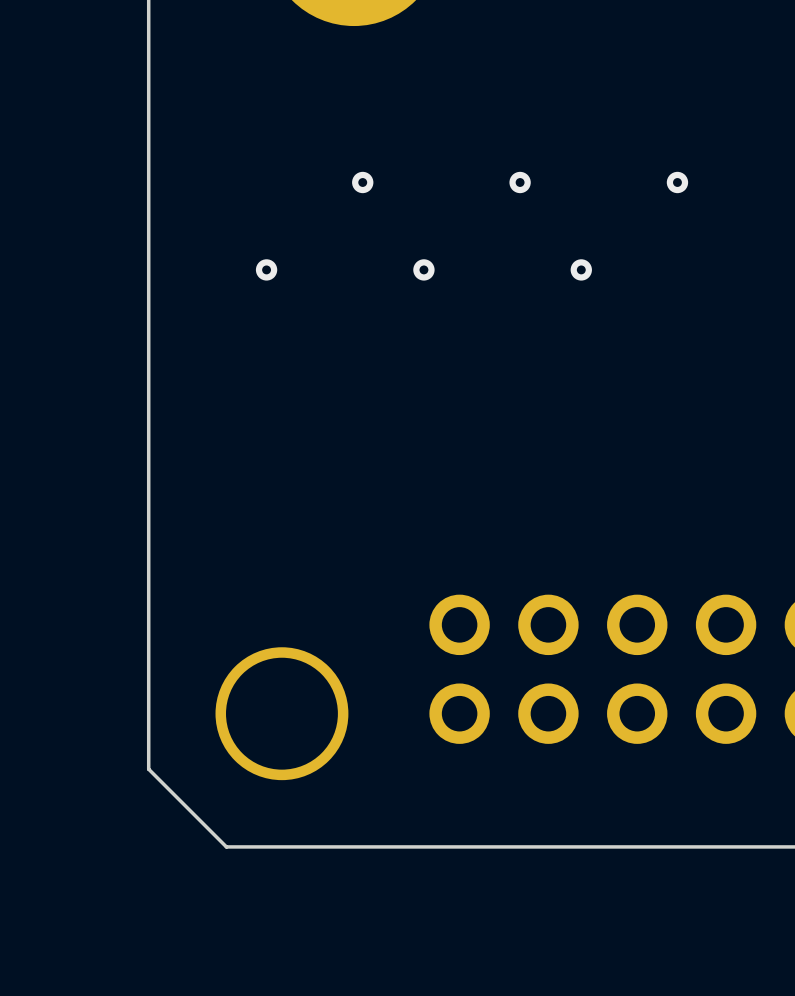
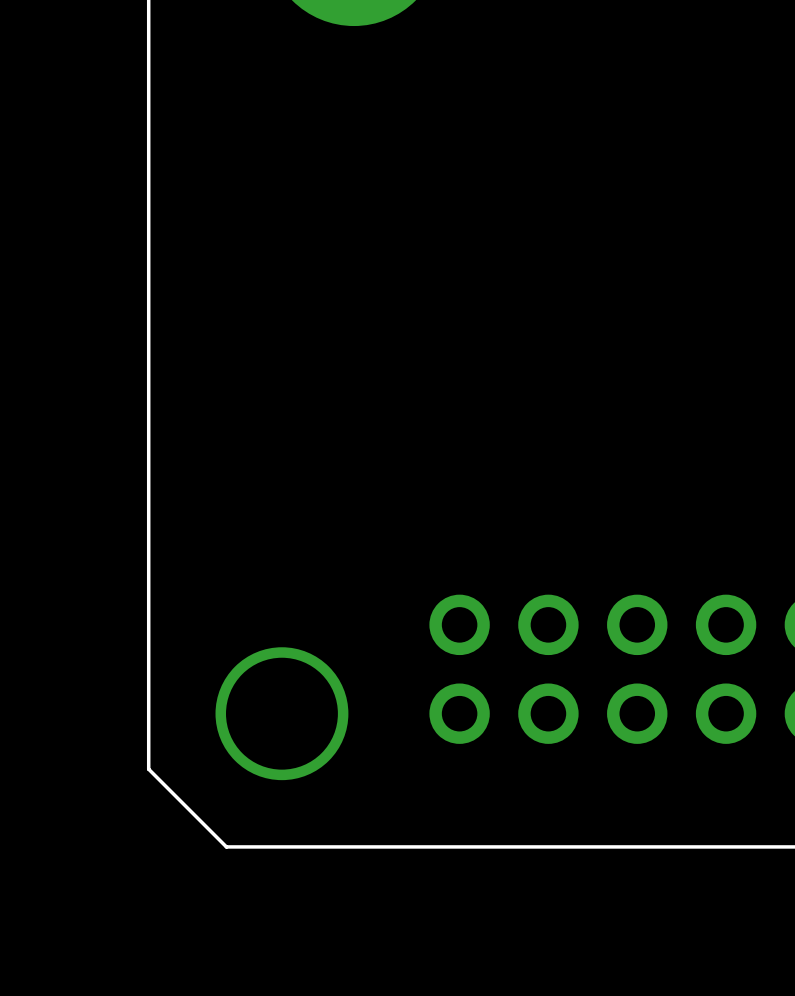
via: (362, 182) -> none
via: (520, 182) -> none
via: (677, 182) -> none
via: (266, 269) -> none
via: (423, 269) -> none
via: (581, 269) -> none

